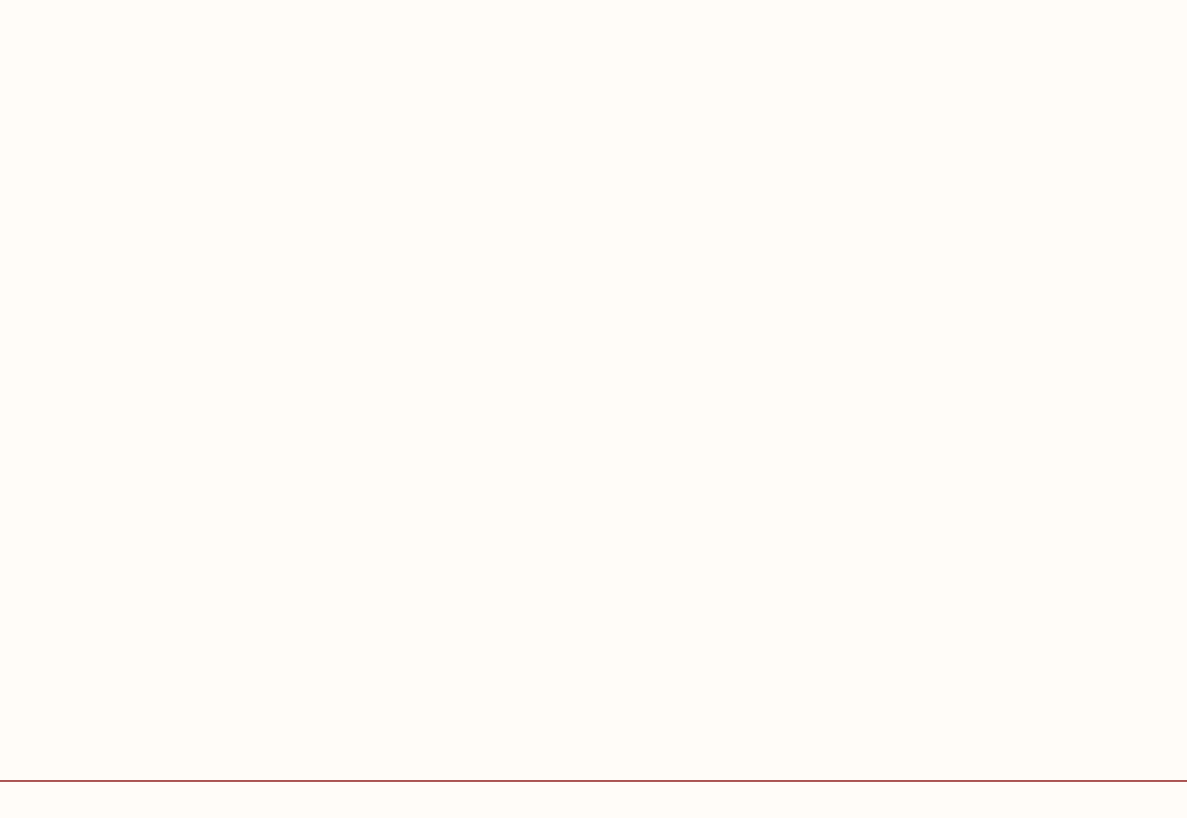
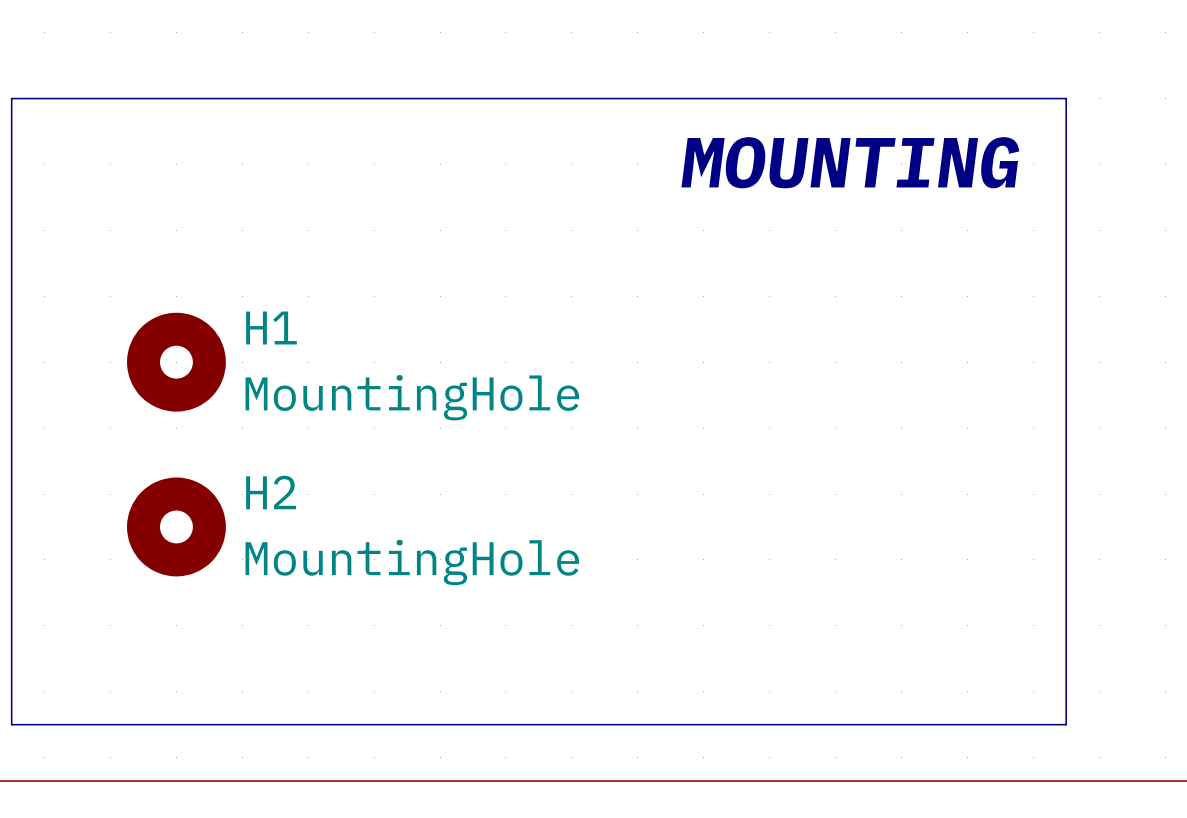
line: none -> (11, 98) (1066, 98) (1066, 724) (11, 724) (11, 98)
text: none -> MOUNTING (850, 162)
H1: none -> MountingHole (176, 362)
H2: none -> MountingHole (176, 526)

